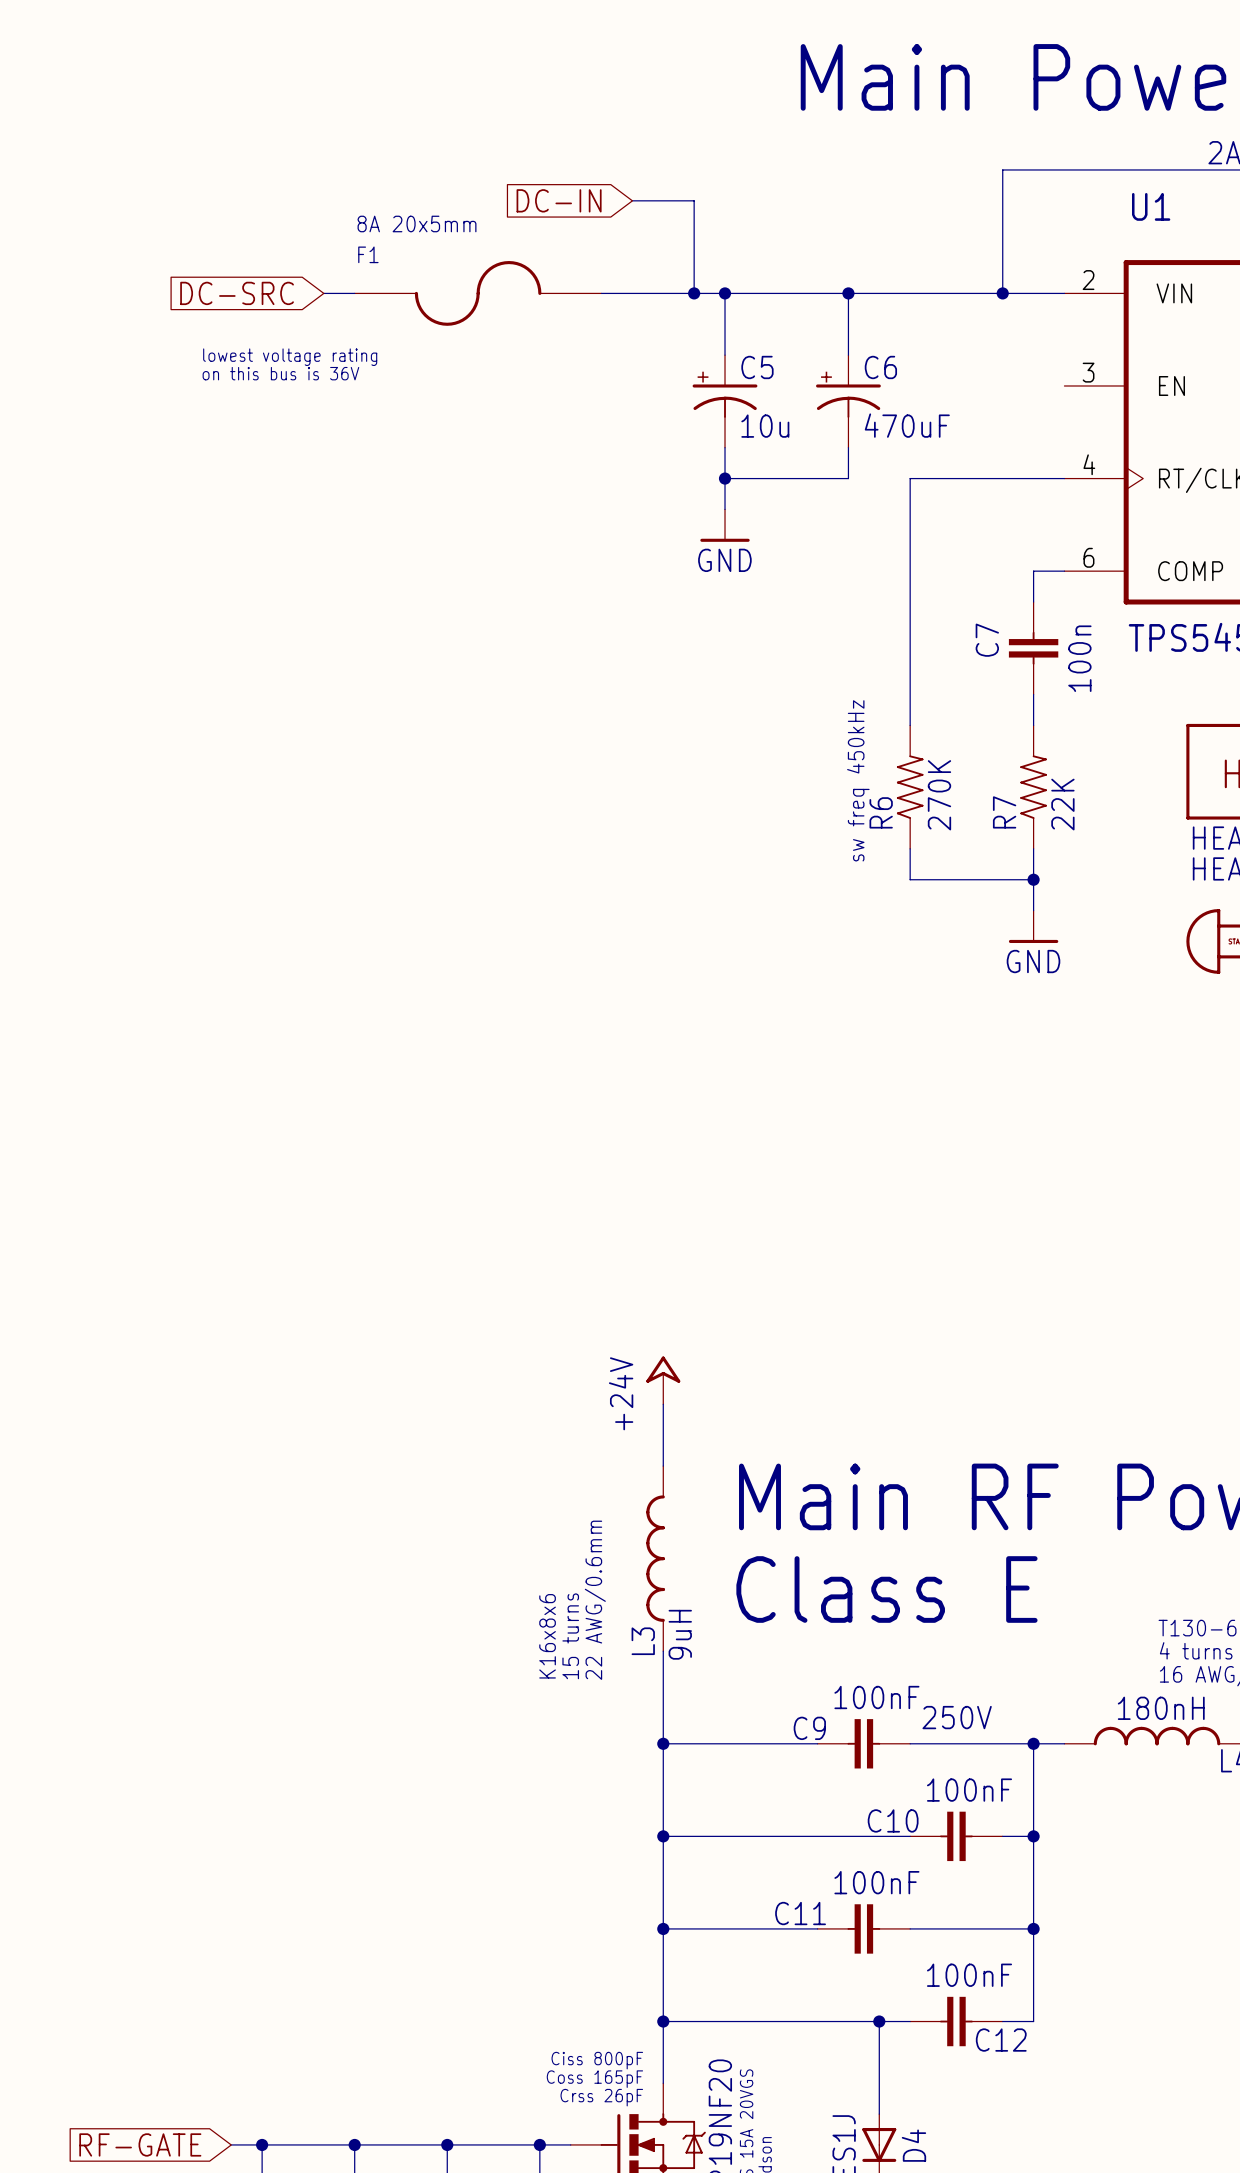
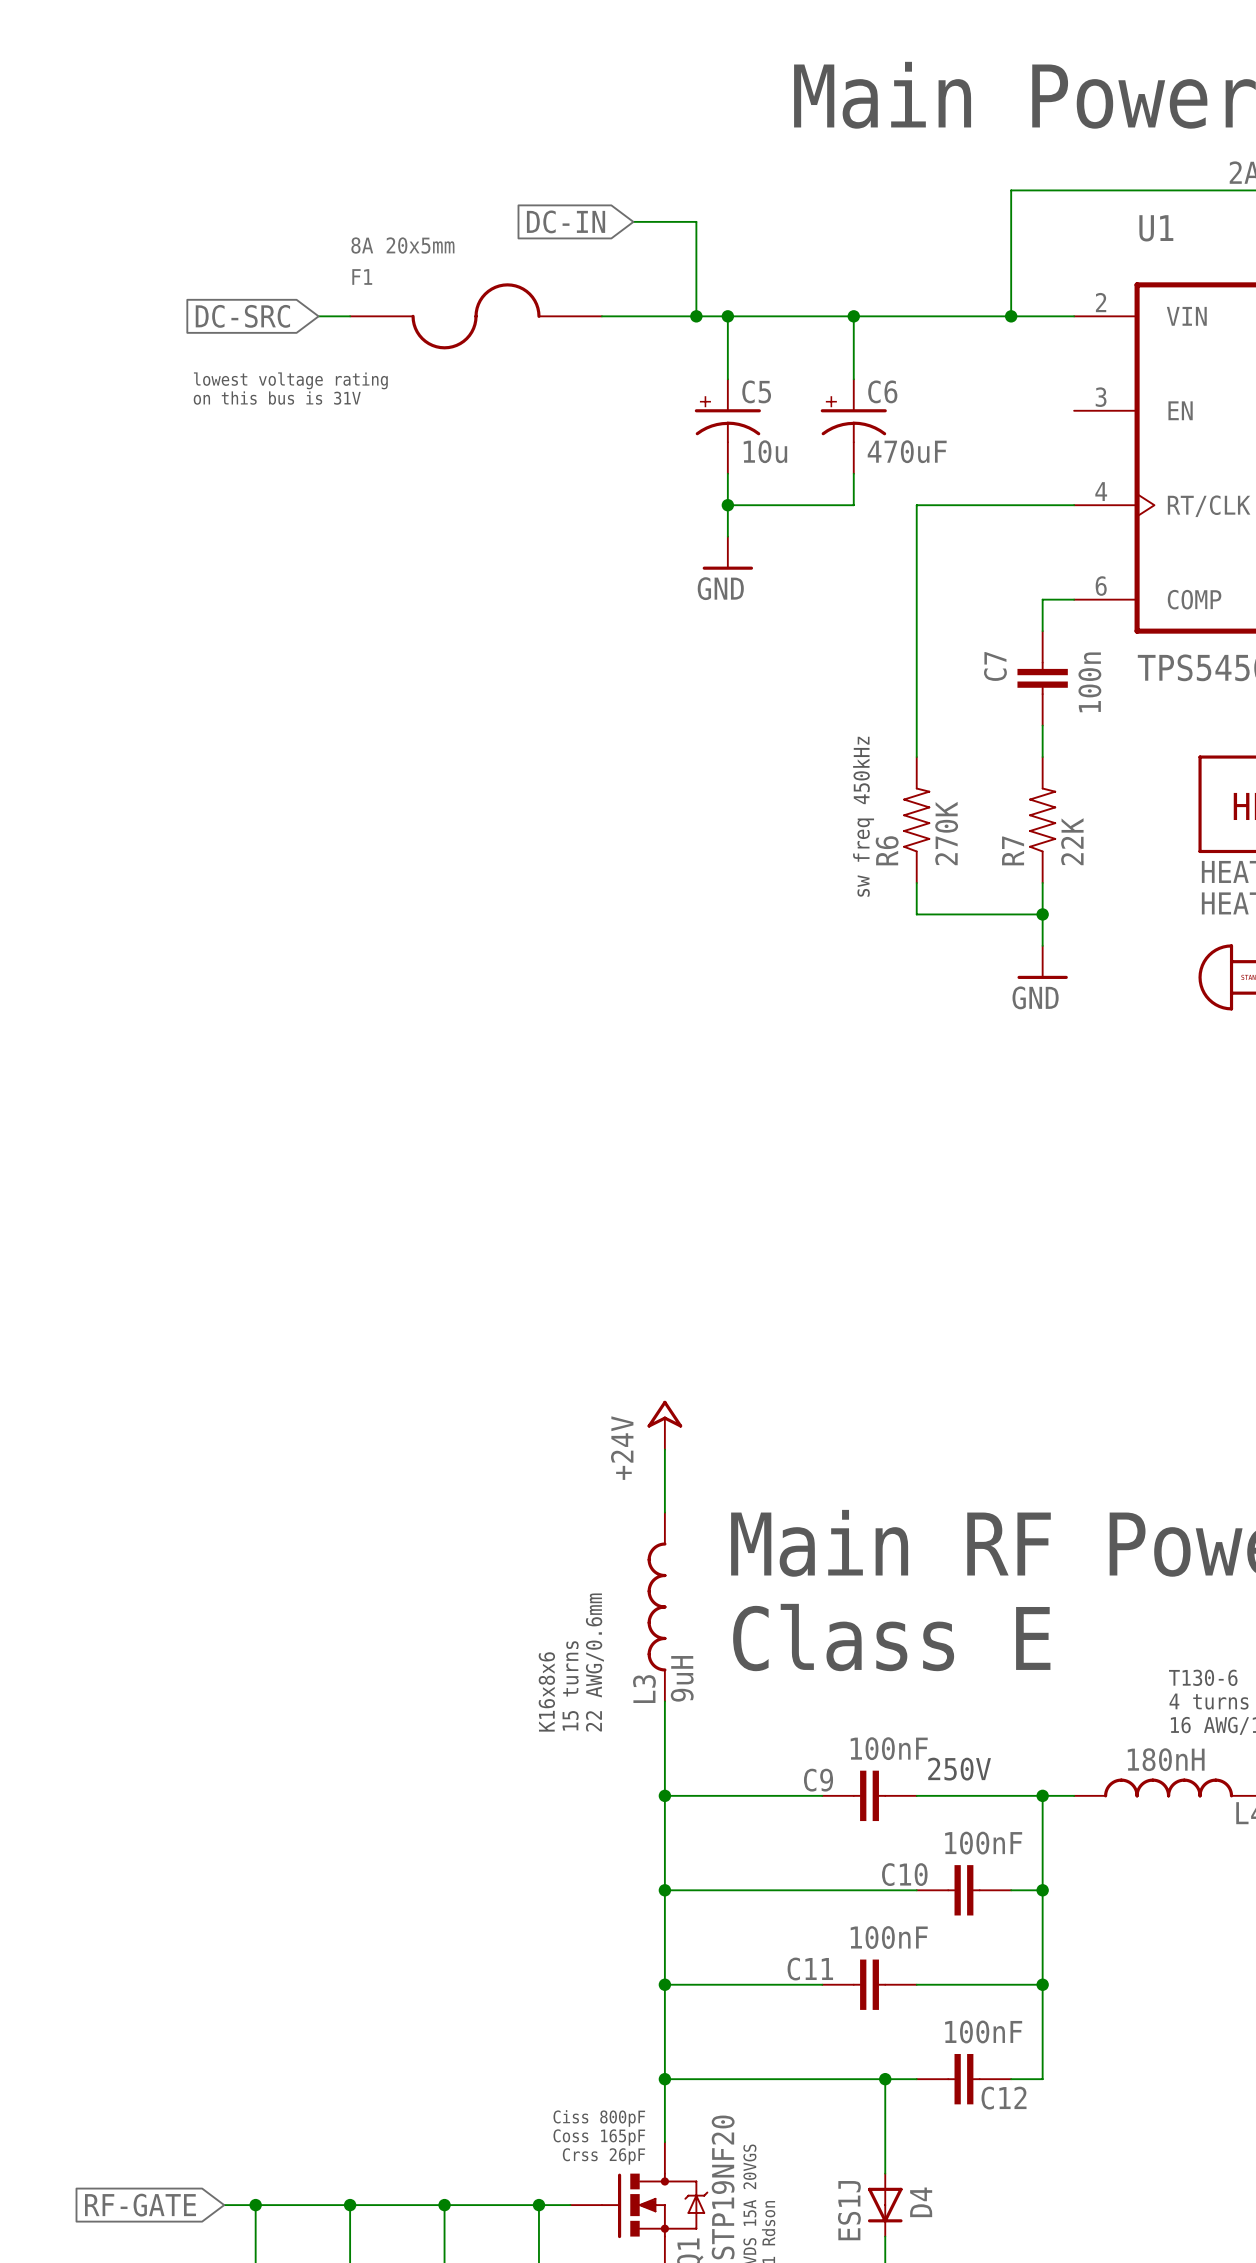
text: on this bus is 36V (280, 373) -> on this bus is 31V (277, 398)

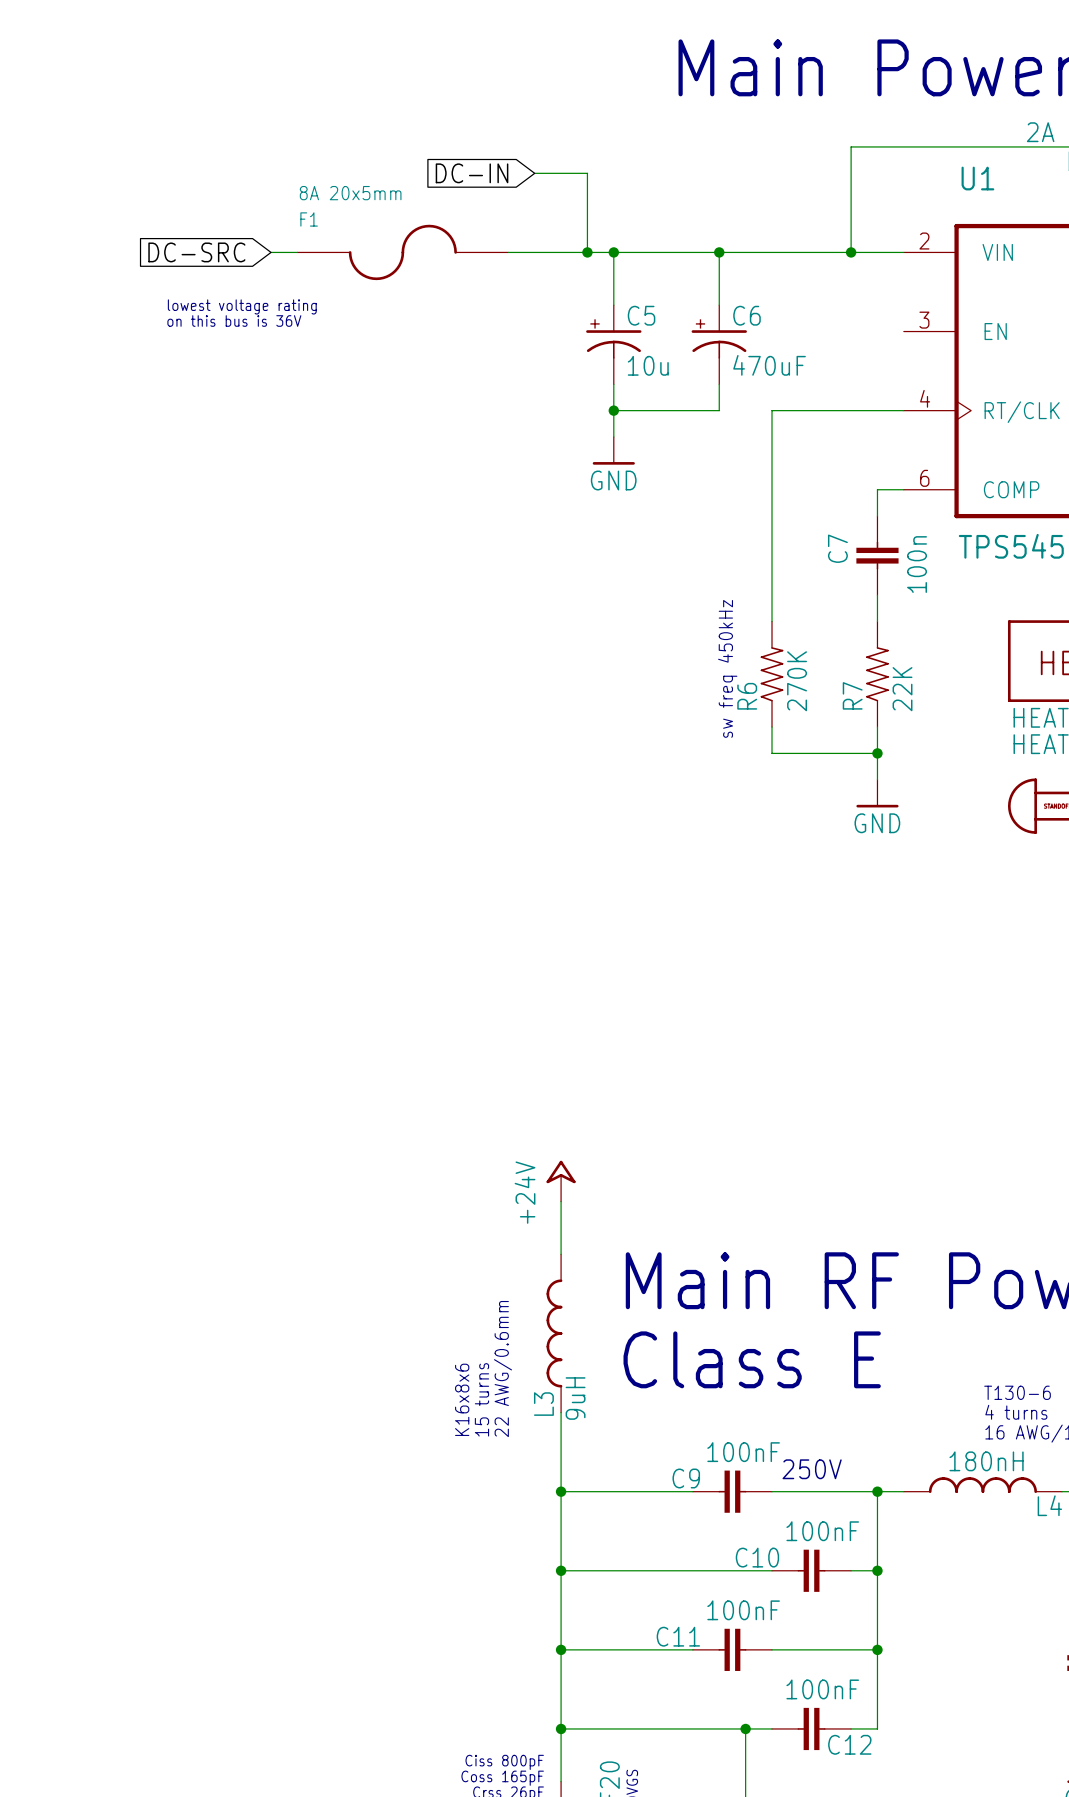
text: on this bus is 31V (277, 398) -> on this bus is 36V (234, 320)

